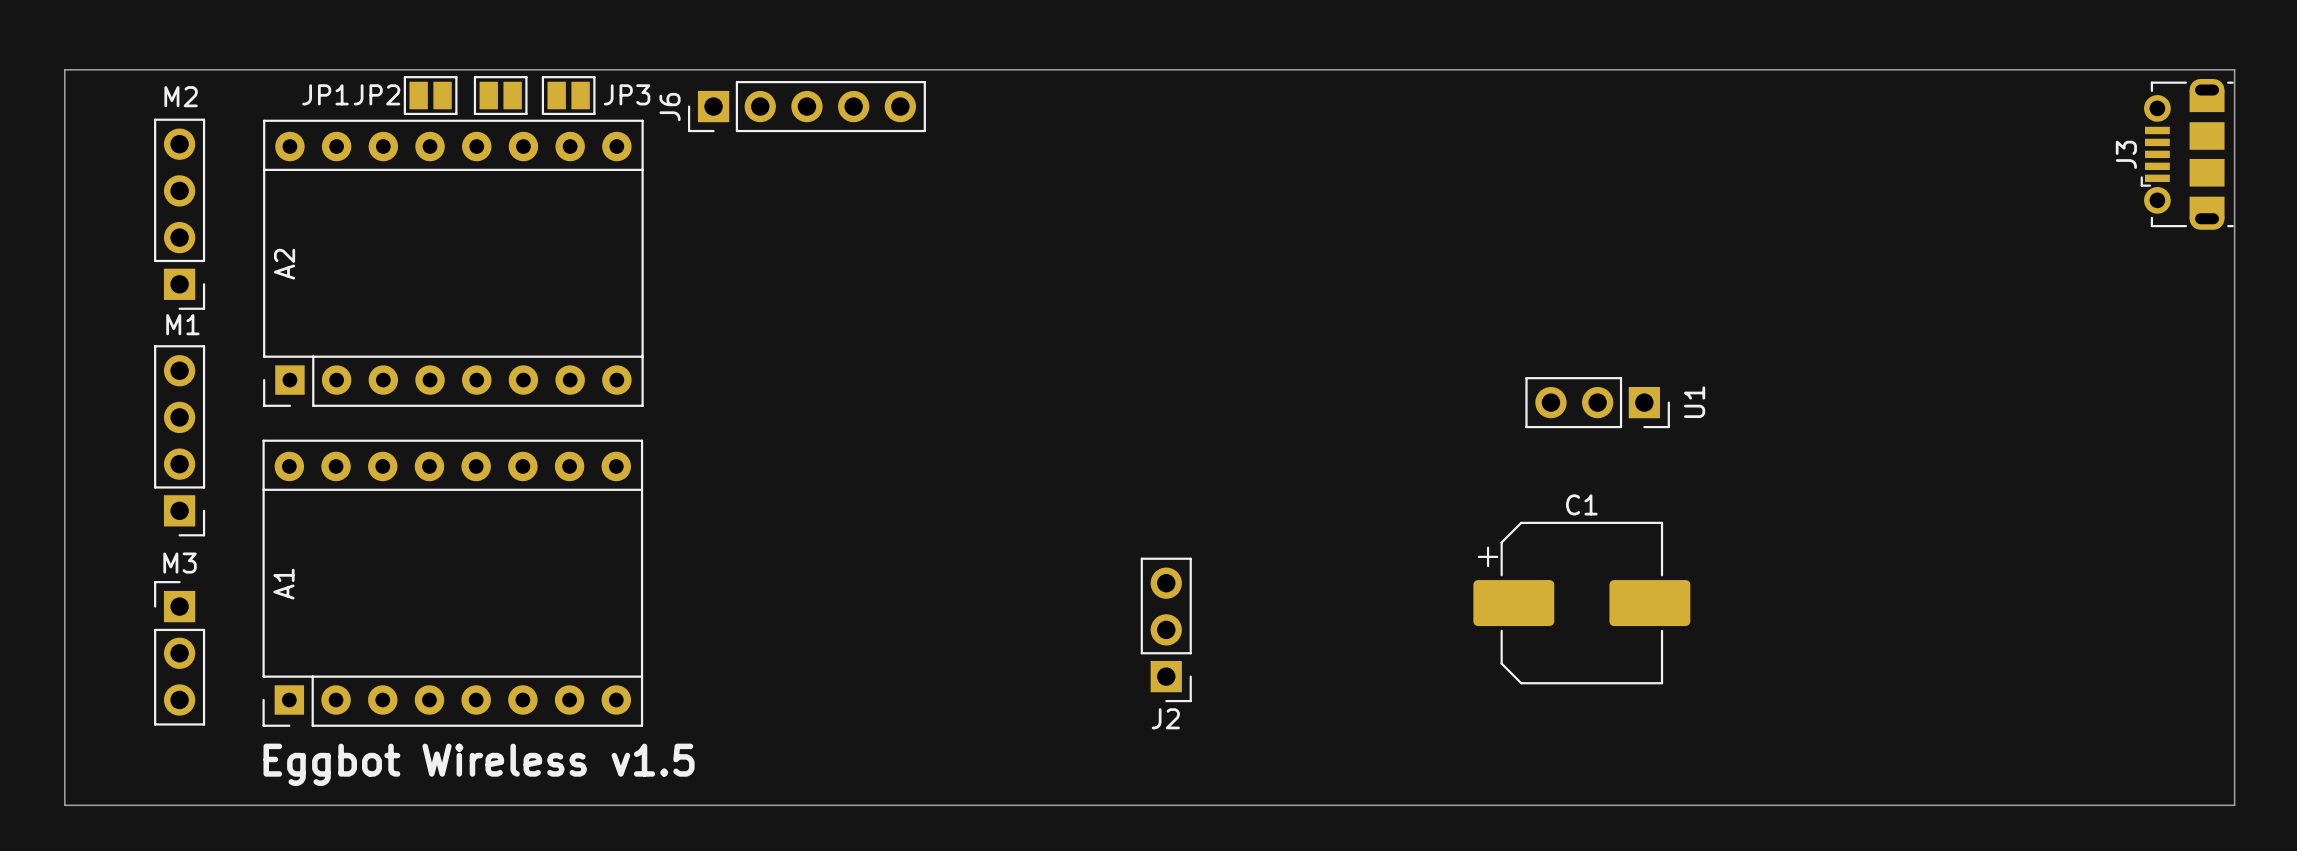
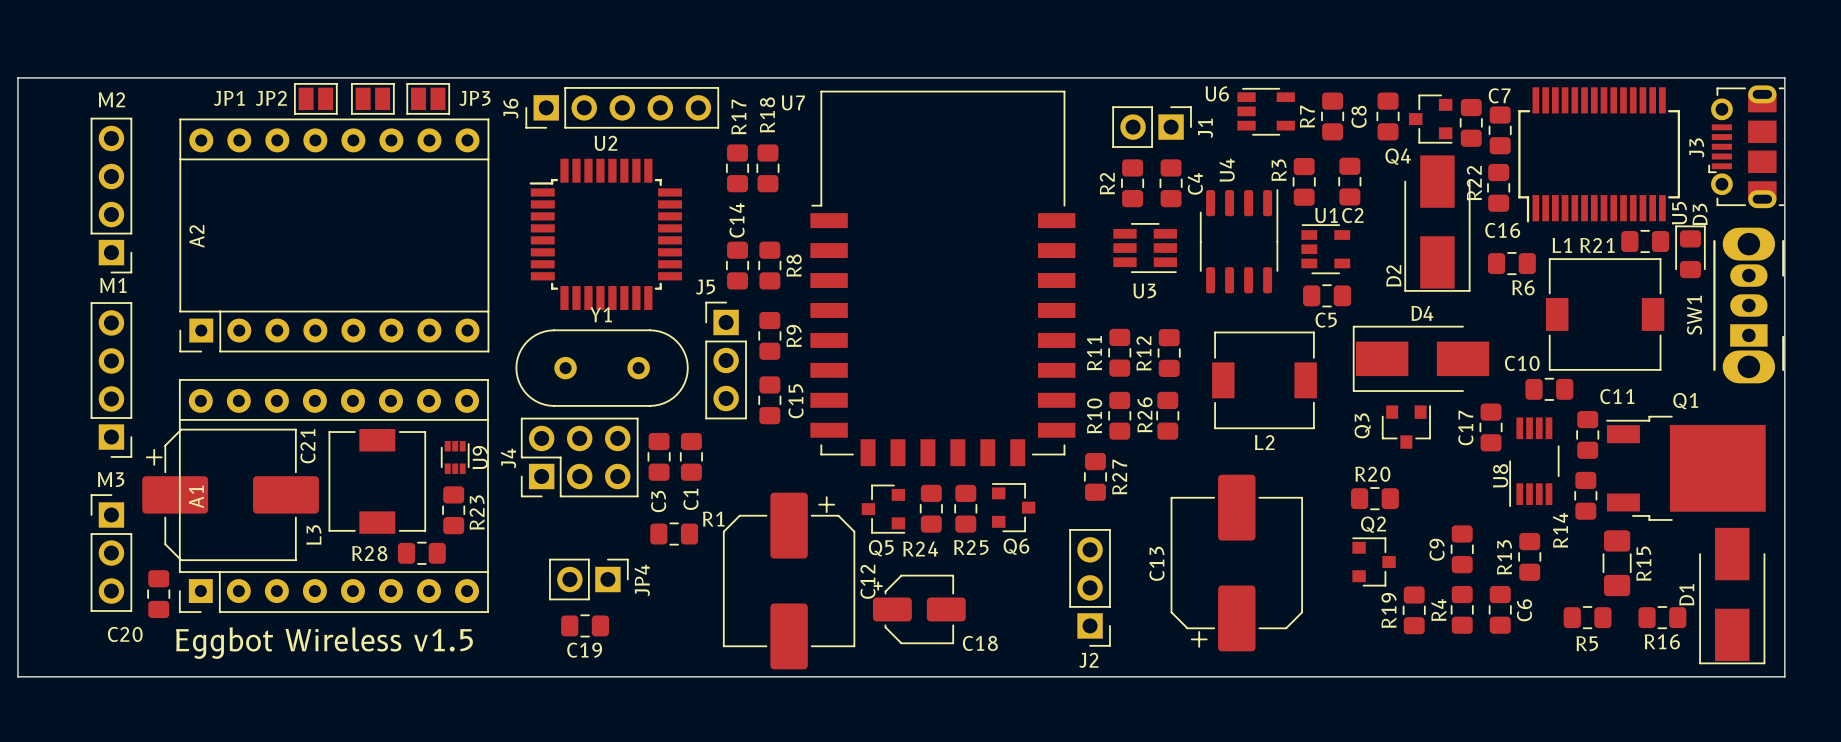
U6: none -> (1266, 111)
R7: none -> (1332, 116)
C8: none -> (1388, 116)
Q4: none -> (1430, 119)
R22: none -> (1471, 122)
J1: none -> (1152, 127)
C7: none -> (1500, 130)
U5: none -> (1599, 154)
R17: none -> (737, 168)
R18: none -> (767, 168)
R3: none -> (1304, 181)
C2: none -> (1349, 181)
R2: none -> (1132, 183)
C4: none -> (1171, 183)
C16: none -> (1498, 187)
D2: none -> (1437, 223)
U2: none -> (605, 234)
U4: none -> (1239, 241)
R21: none -> (1645, 241)
U3: none -> (1145, 248)
D3: none -> (1690, 251)
R6: none -> (1511, 263)
C14: none -> (737, 265)
R8: none -> (769, 265)
U7: none -> (942, 278)
C5: none -> (1327, 295)
SW1: none -> (1748, 305)
L1: none -> (1605, 314)
U1 footprint: [1525, 377, 1670, 429] -> [1301, 224, 1351, 275]
R9: none -> (769, 335)
U1 name position: U1 (1694, 402) -> U1 (1326, 215)
R11: none -> (1119, 352)
R12: none -> (1169, 353)
D4: none -> (1421, 358)
J5: none -> (726, 360)
Y1: none -> (602, 368)
L2: none -> (1264, 380)
C10: none -> (1549, 389)
C15: none -> (769, 400)
R10: none -> (1119, 415)
R26: none -> (1167, 415)
Q3: none -> (1406, 427)
C17: none -> (1491, 427)
C1 name position: C1 (1581, 504) -> C1 (690, 499)
C11: none -> (1587, 434)
C1 footprint: [1473, 521, 1691, 685] -> [679, 432, 703, 481]
U9: none -> (455, 457)
J4: none -> (579, 457)
C3: none -> (659, 456)
U8: none -> (1534, 462)
Q1: none -> (1685, 468)
R27: none -> (1095, 476)
L3: none -> (377, 481)
C21: none -> (230, 494)
R14: none -> (1585, 495)
R20: none -> (1374, 498)
Q6: none -> (1013, 507)
R24: none -> (931, 508)
R25: none -> (965, 508)
Q5: none -> (883, 509)
R23: none -> (453, 510)
R1: none -> (674, 534)
J2 position: (1166, 629) -> (1090, 587)
C9: none -> (1462, 549)
R28: none -> (421, 553)
R13: none -> (1529, 556)
Q2: none -> (1373, 561)
C13: none -> (1236, 563)
R15: none -> (1617, 563)
JP4: none -> (588, 579)
C12: none -> (789, 581)
C20: none -> (158, 594)
D1: none -> (1732, 596)
C18: none -> (919, 609)
R19: none -> (1414, 610)
R4: none -> (1462, 609)
C6: none -> (1500, 609)
R5: none -> (1587, 617)
R16: none -> (1662, 617)
C19: none -> (585, 625)

